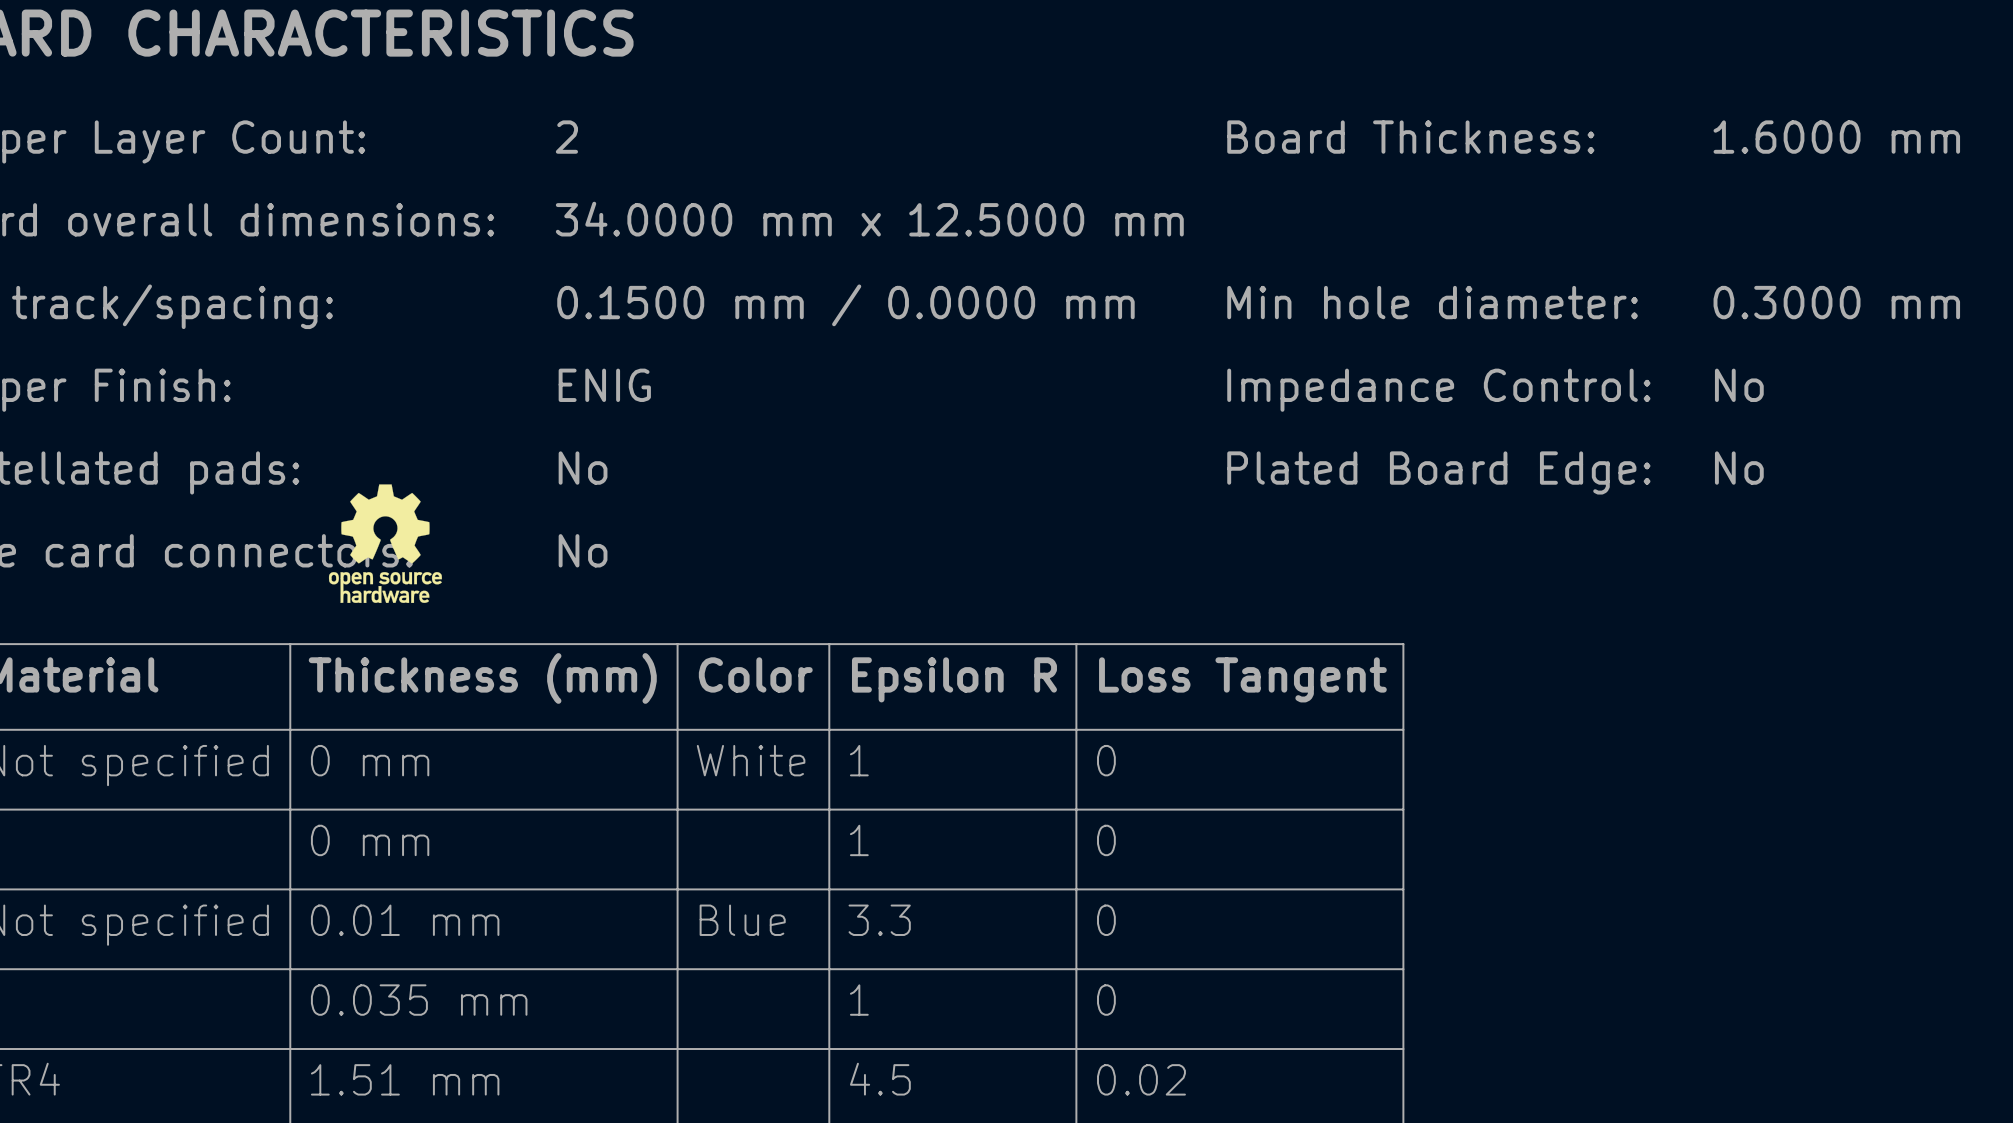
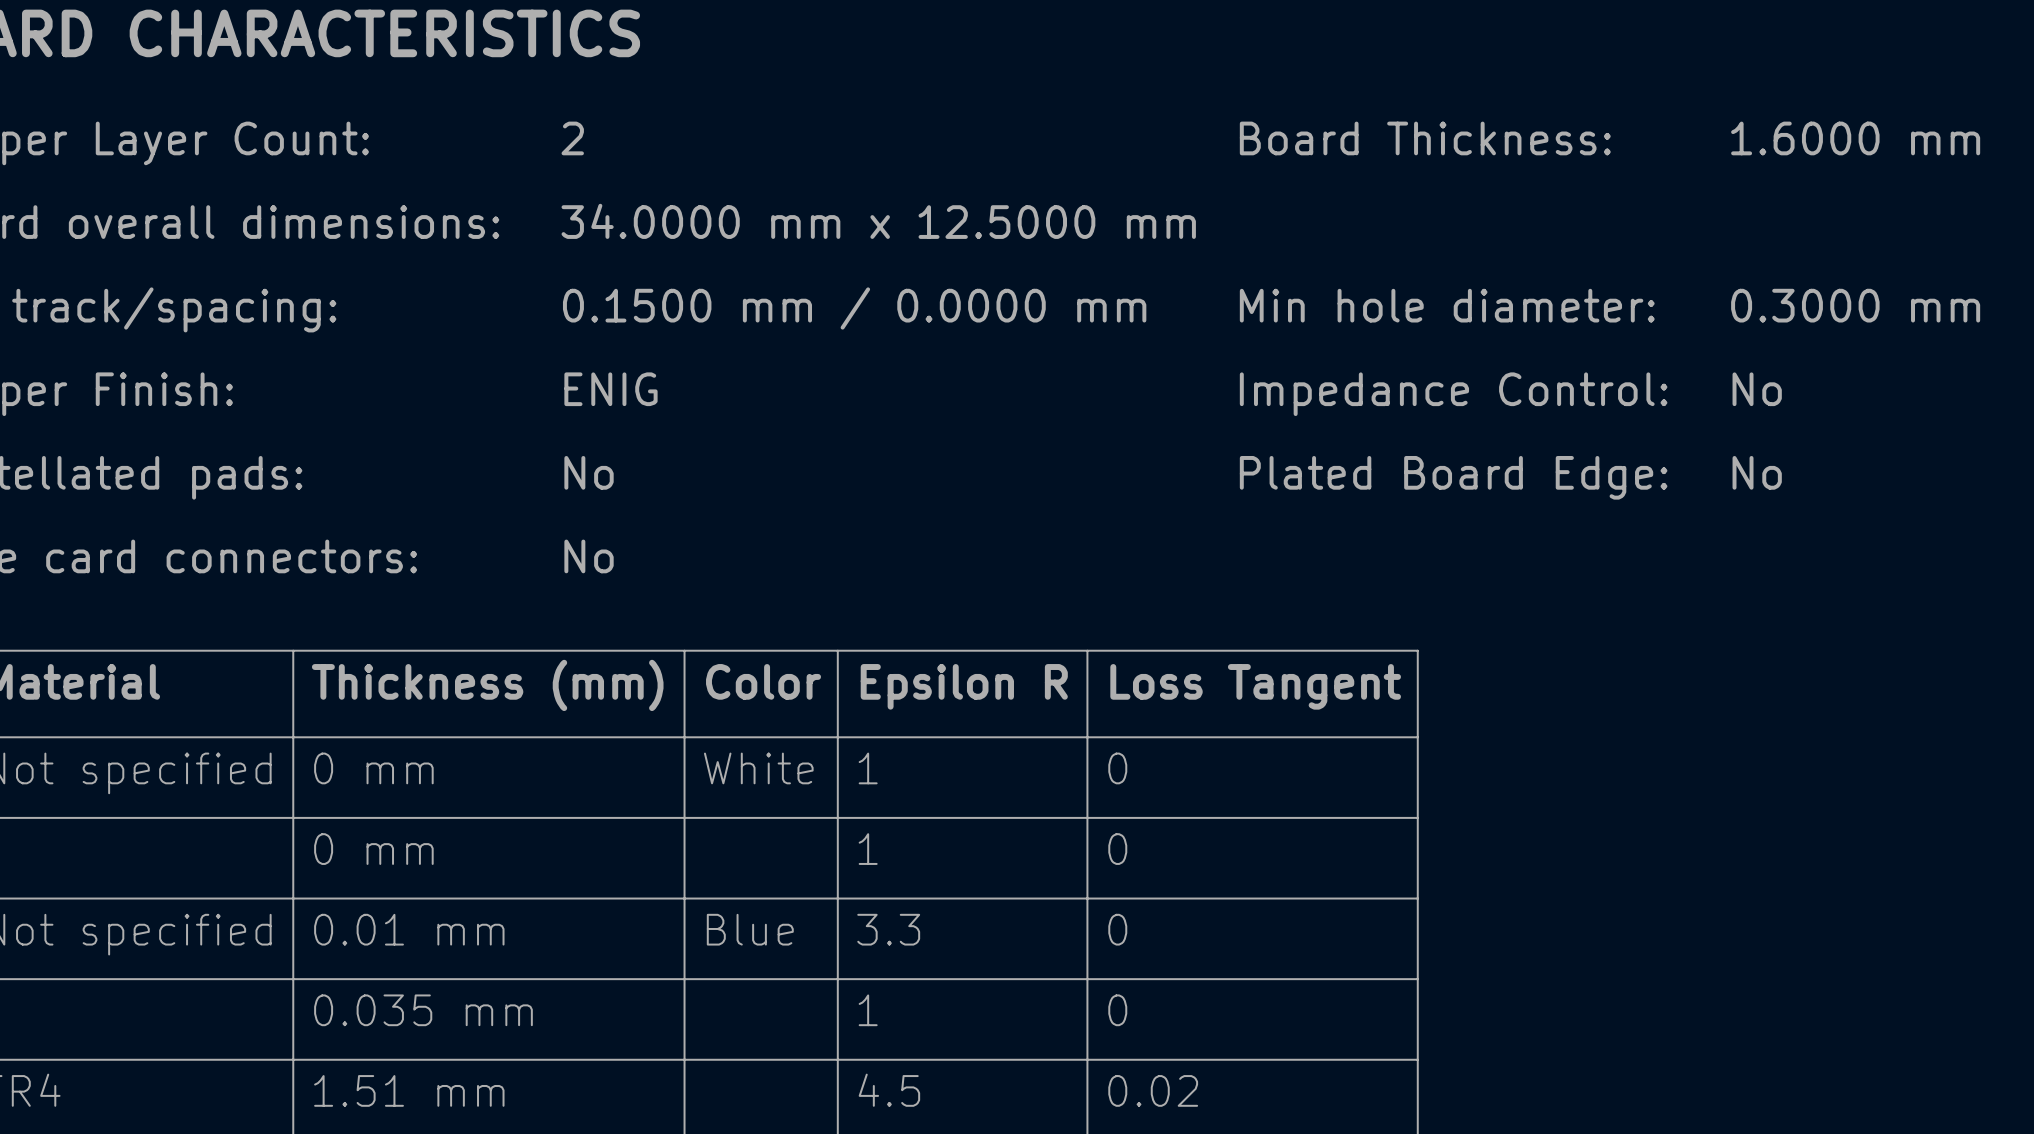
drawing: [328, 484, 442, 603] -> none

